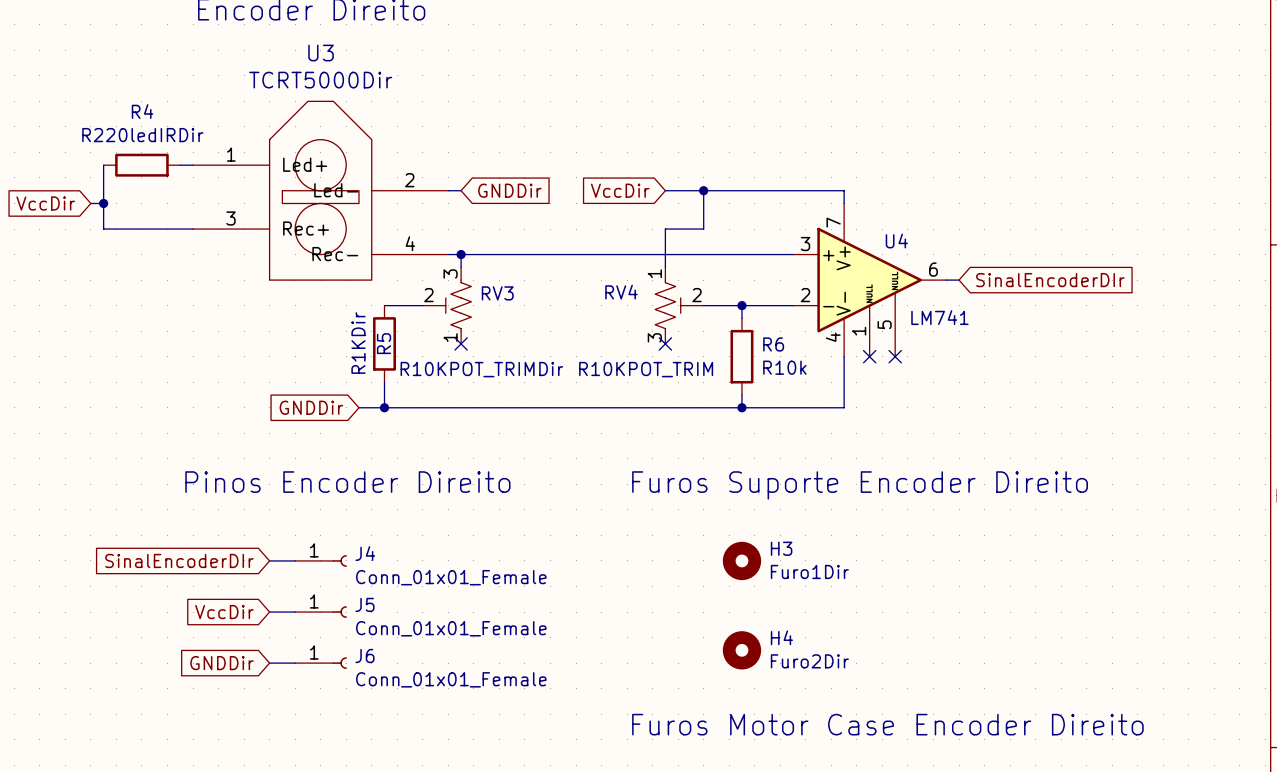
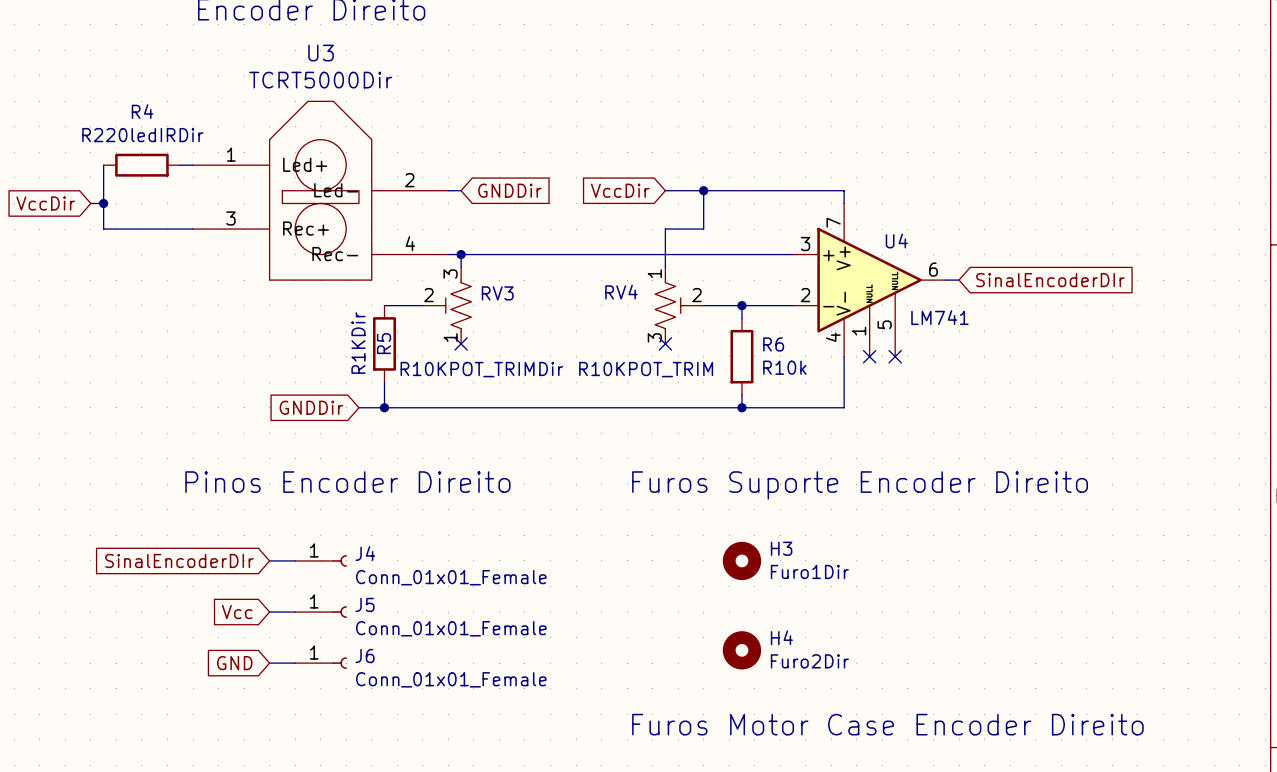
global label: VccDir (224, 612) -> Vcc (237, 612)
global label: GNDDir (222, 663) -> GND (234, 663)

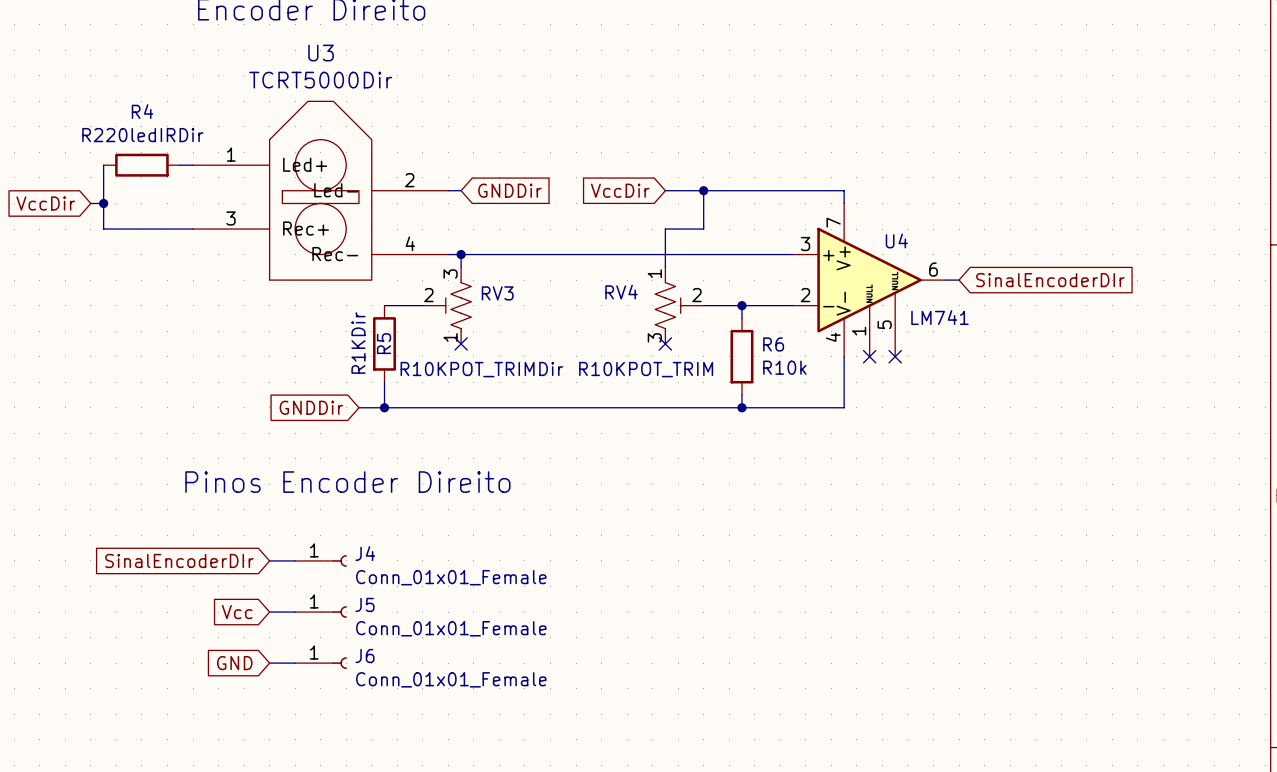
text: Furos Suporte Encoder Direito (860, 485) -> none
H3: Furo1Dir (741, 560) -> none
H4: Furo2Dir (741, 650) -> none
text: Furos Motor Case Encoder Direito (887, 724) -> none

